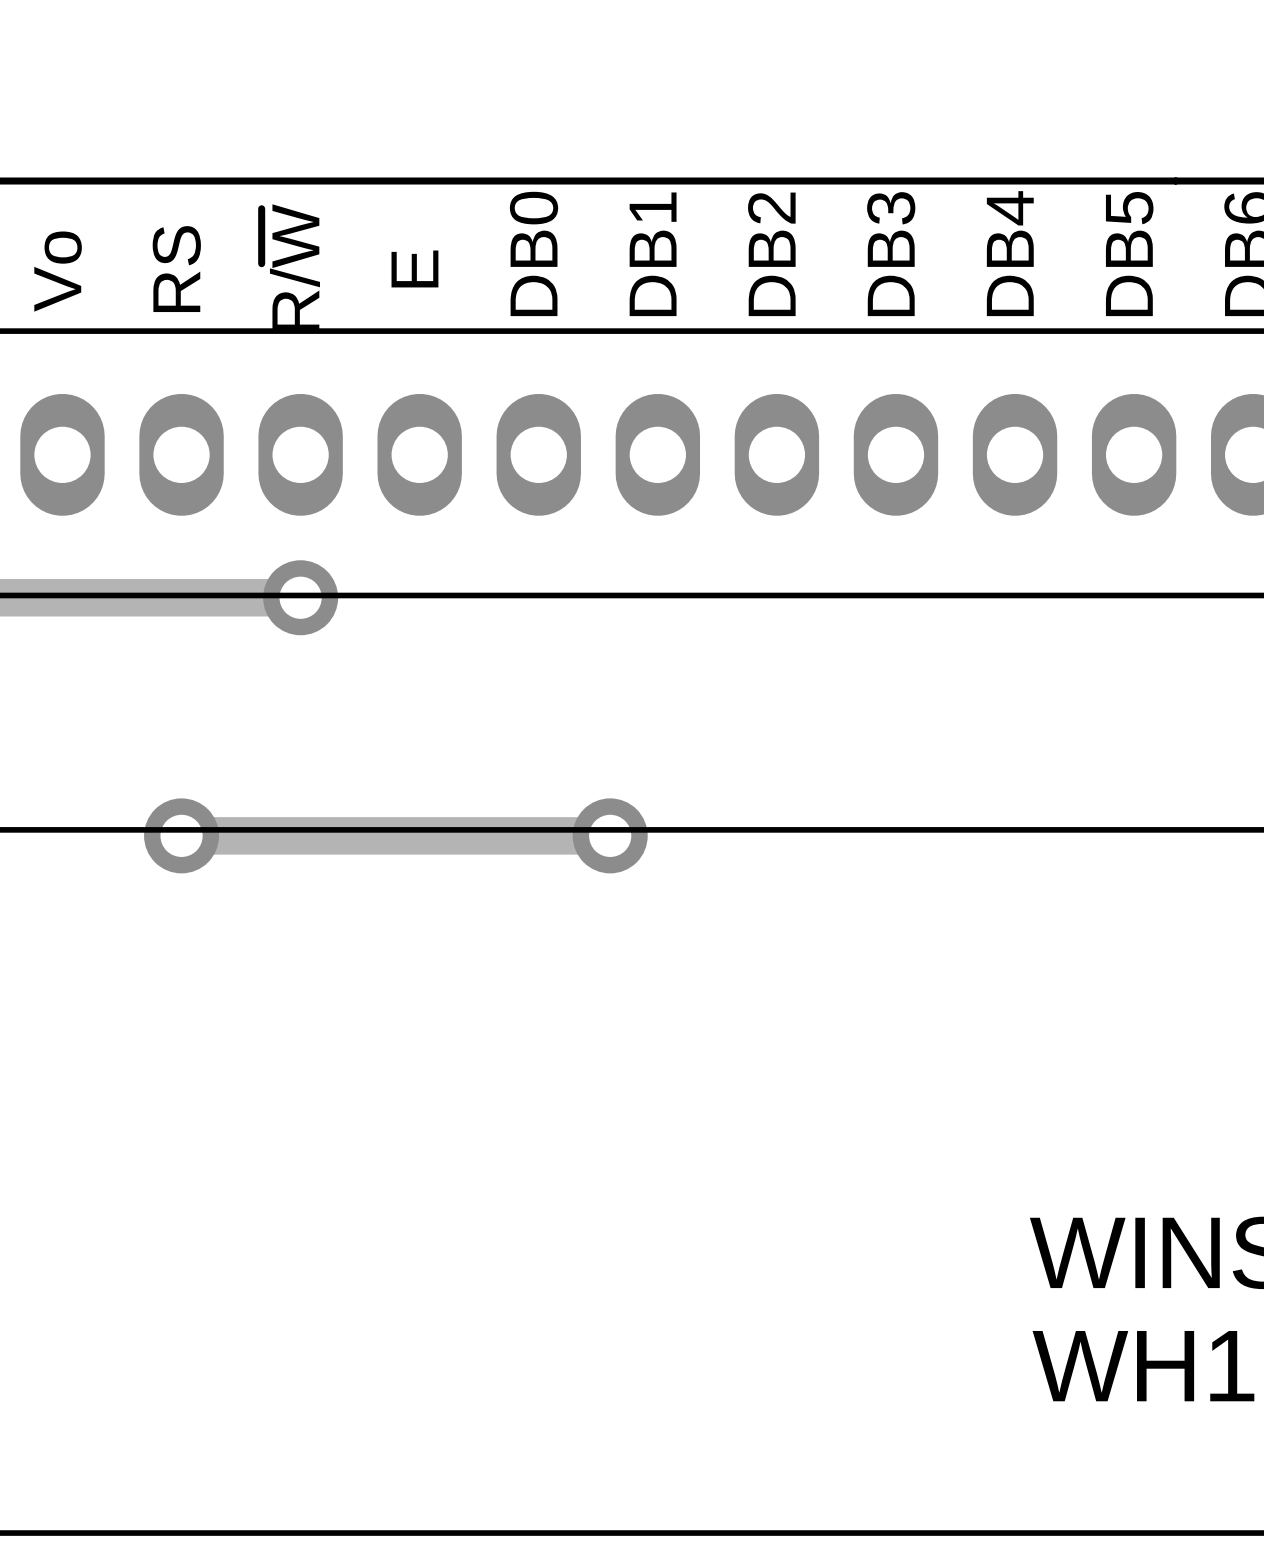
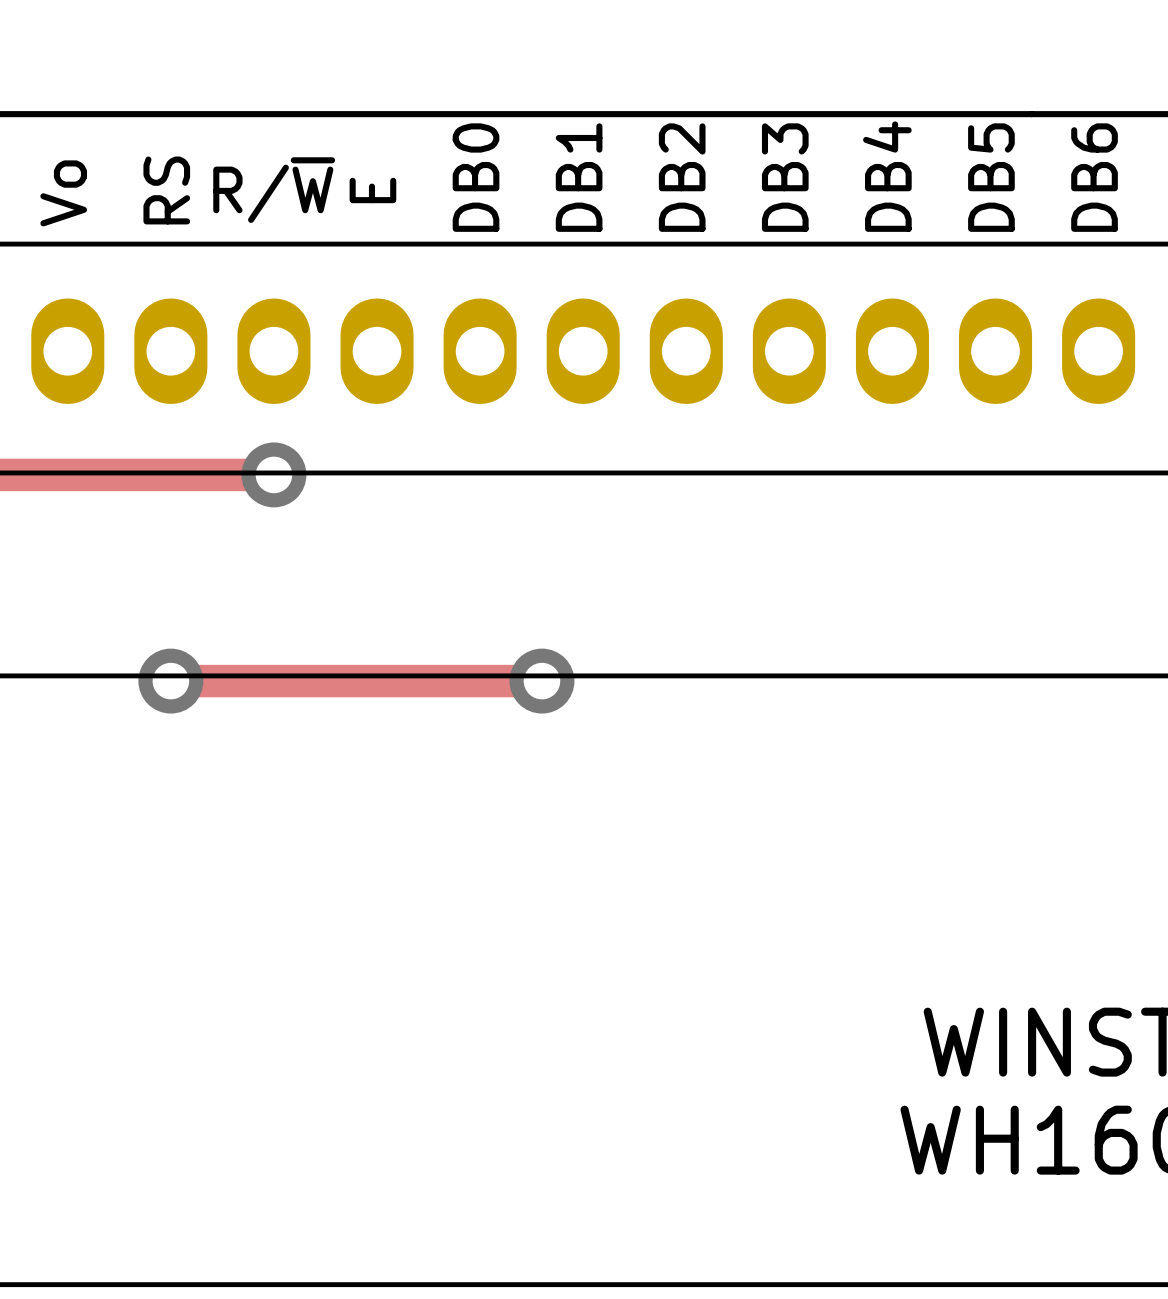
text rotation: 0° (290, 267) -> 90° clockwise (274, 190)

